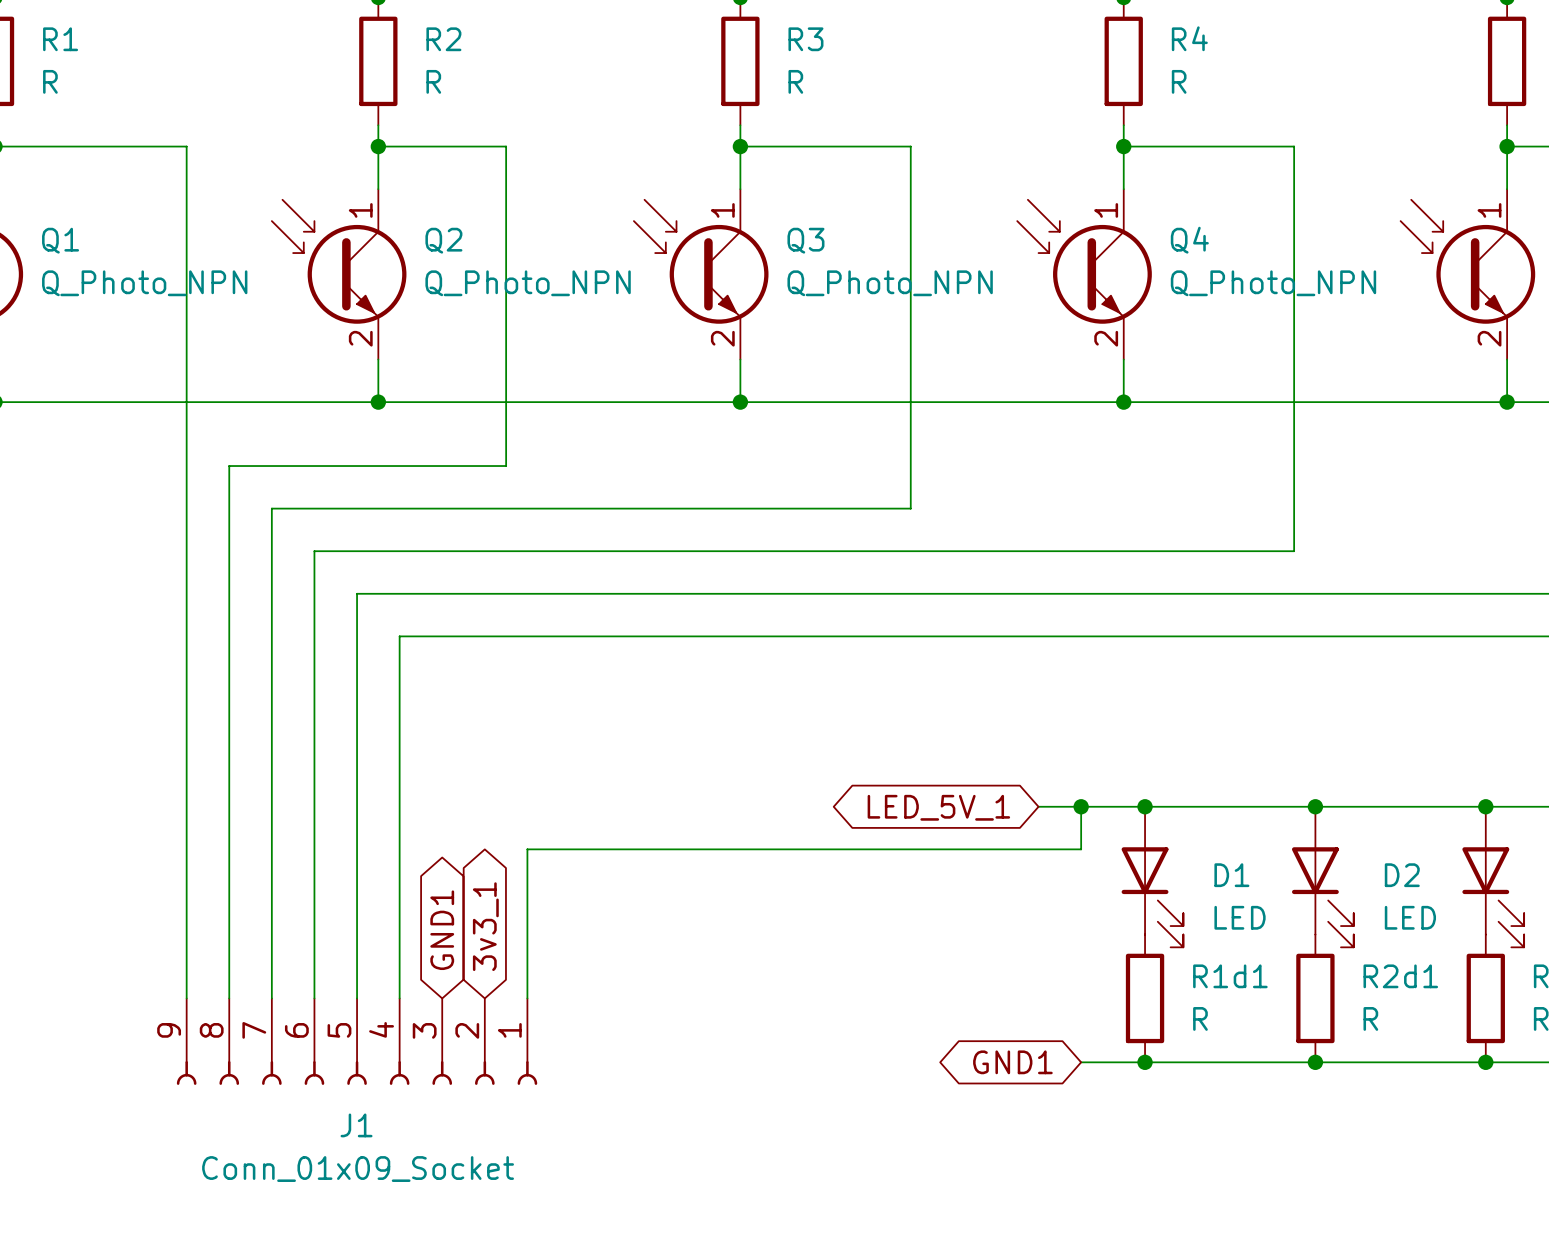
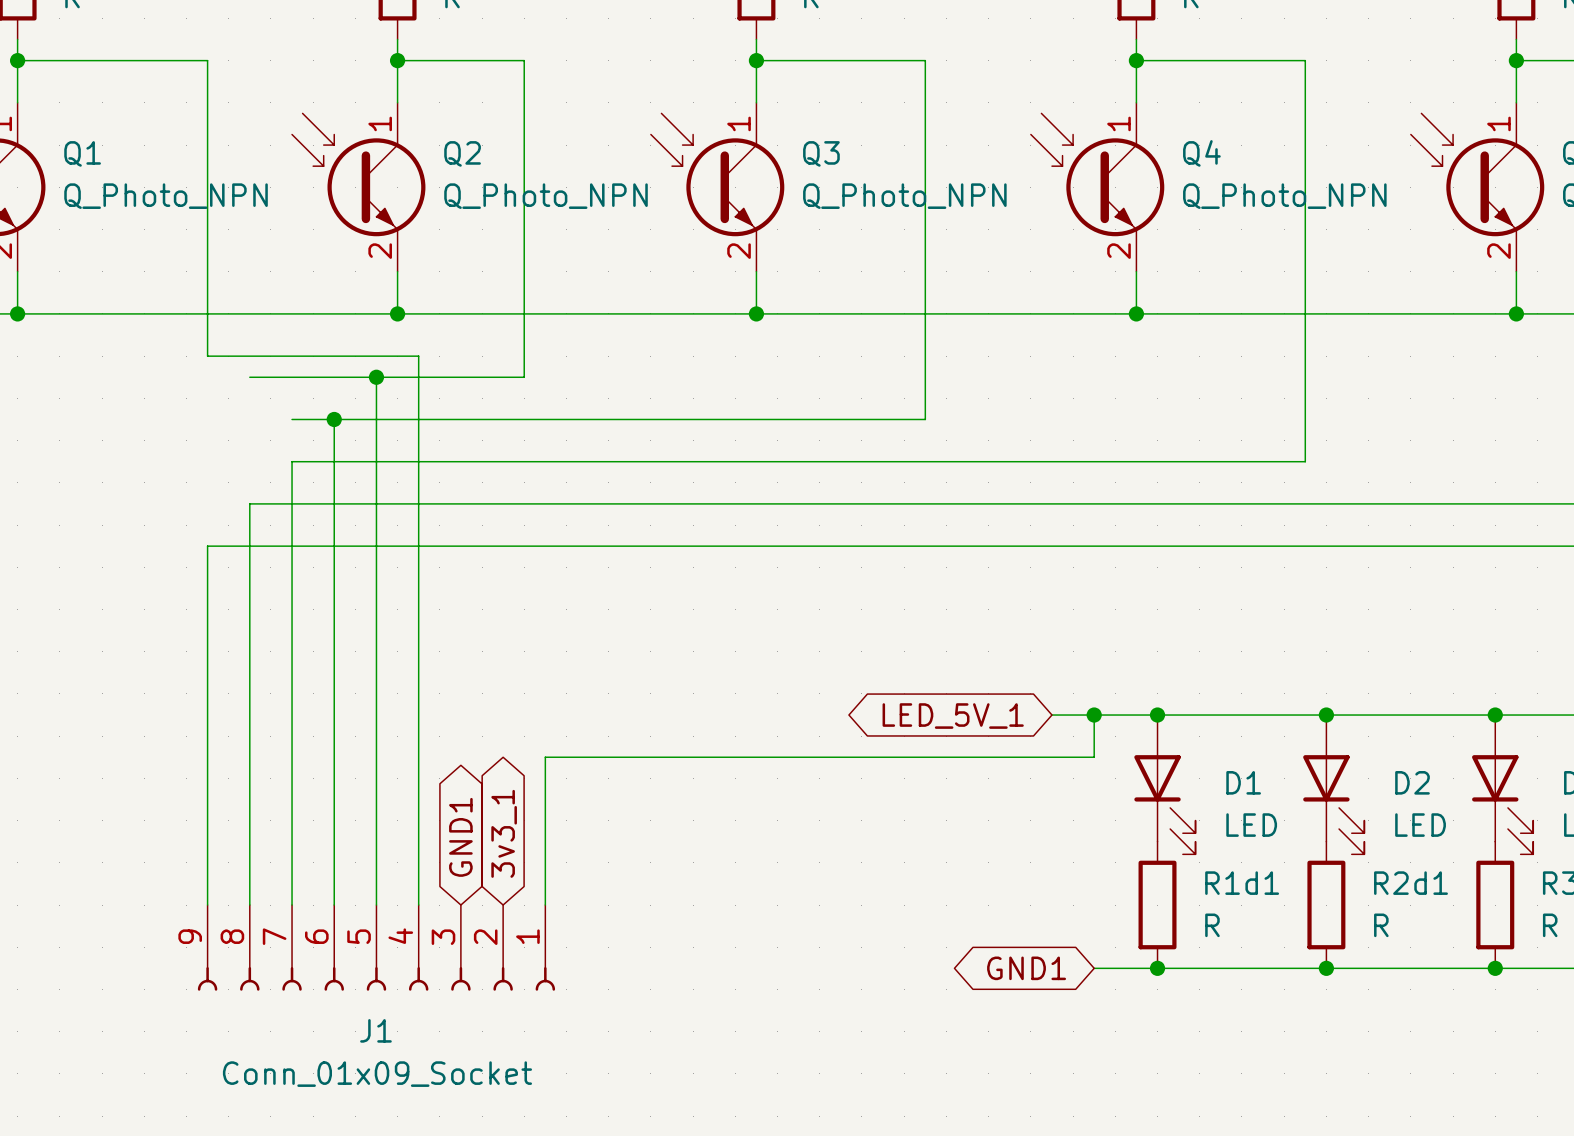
wire: (186, 444) (186, 636) -> (207, 356) (418, 356) (418, 546) (207, 546)
wire: (229, 466) (229, 593) -> (376, 377) (376, 503) (249, 503)
junction: none -> (376, 377)
wire: (271, 508) (271, 551) -> (334, 419) (334, 461) (292, 461)
junction: none -> (334, 419)

